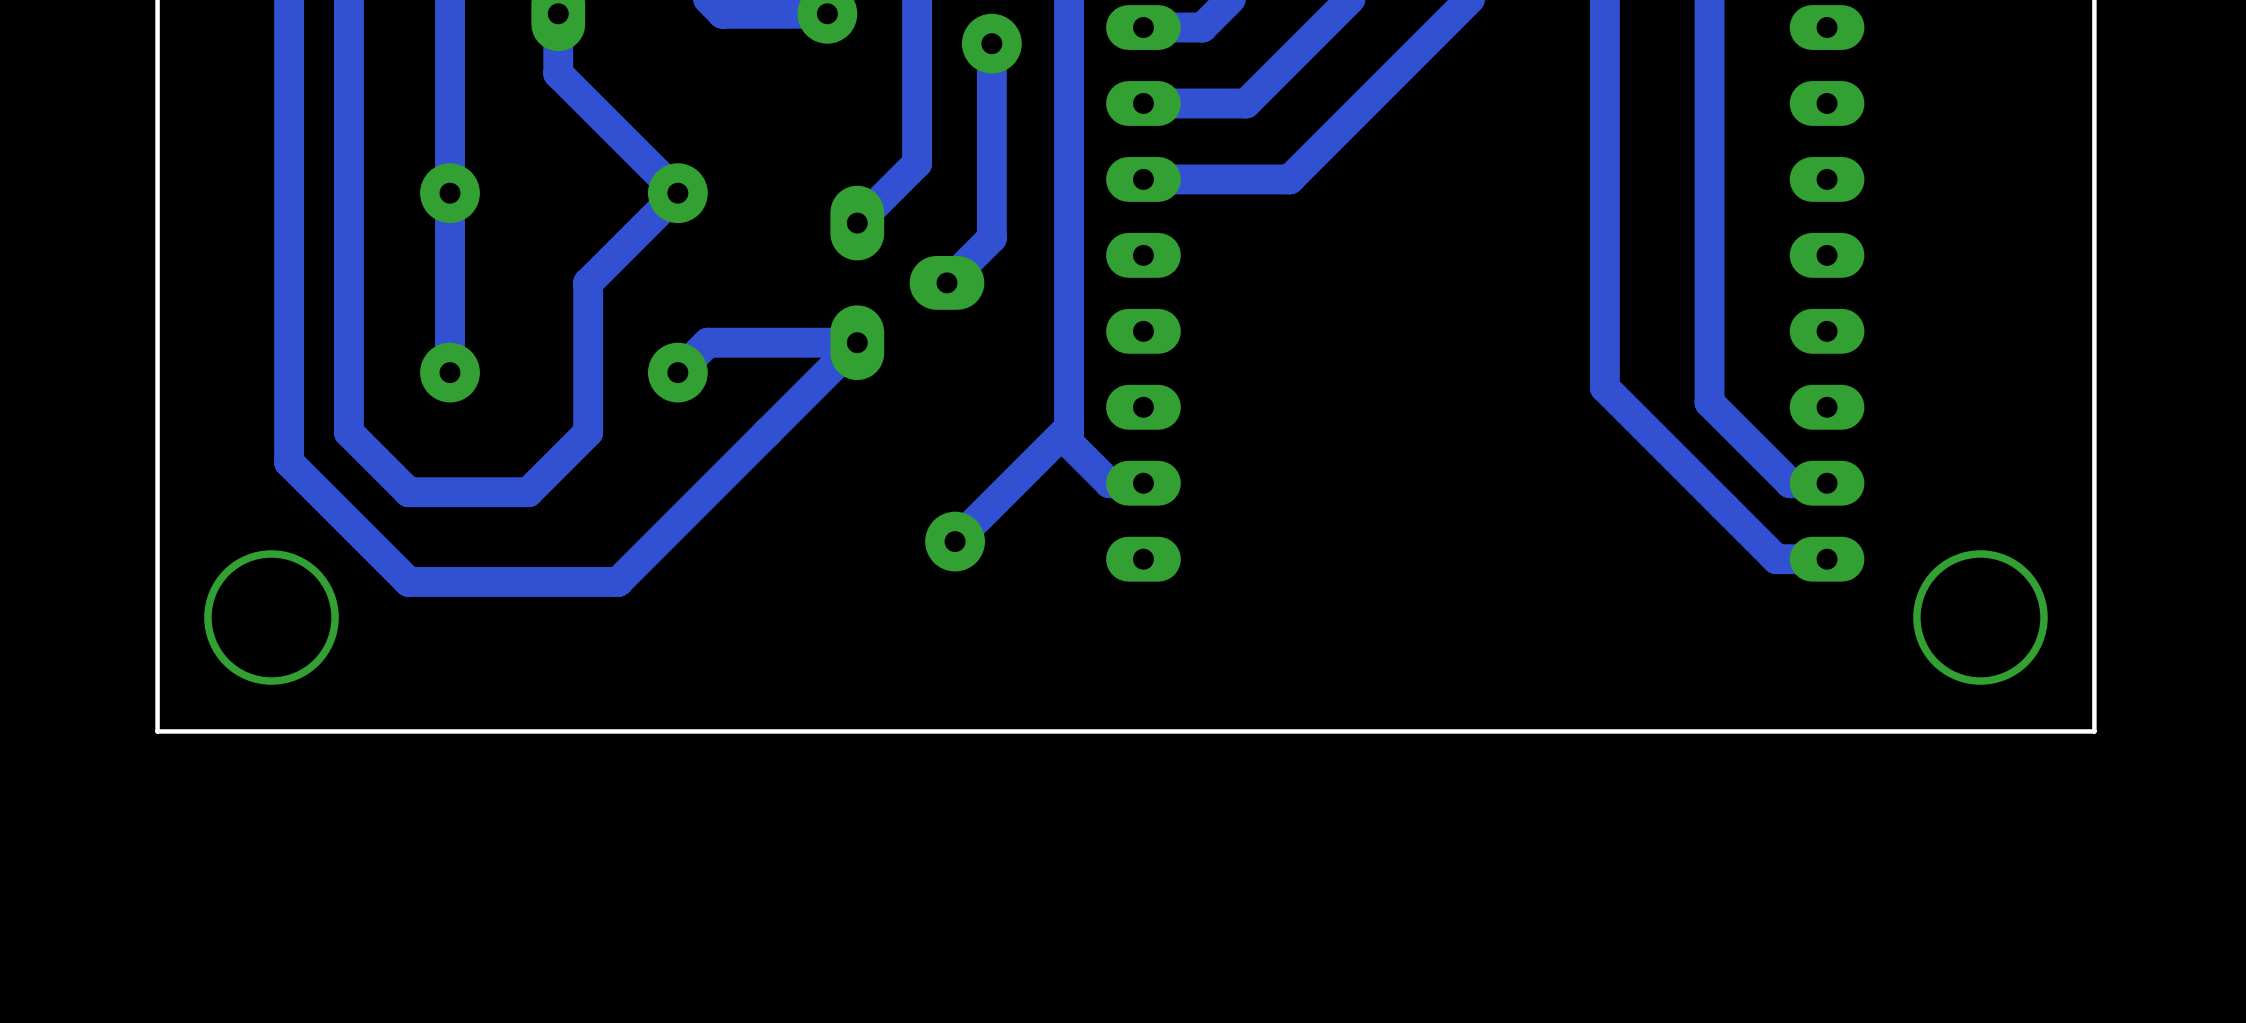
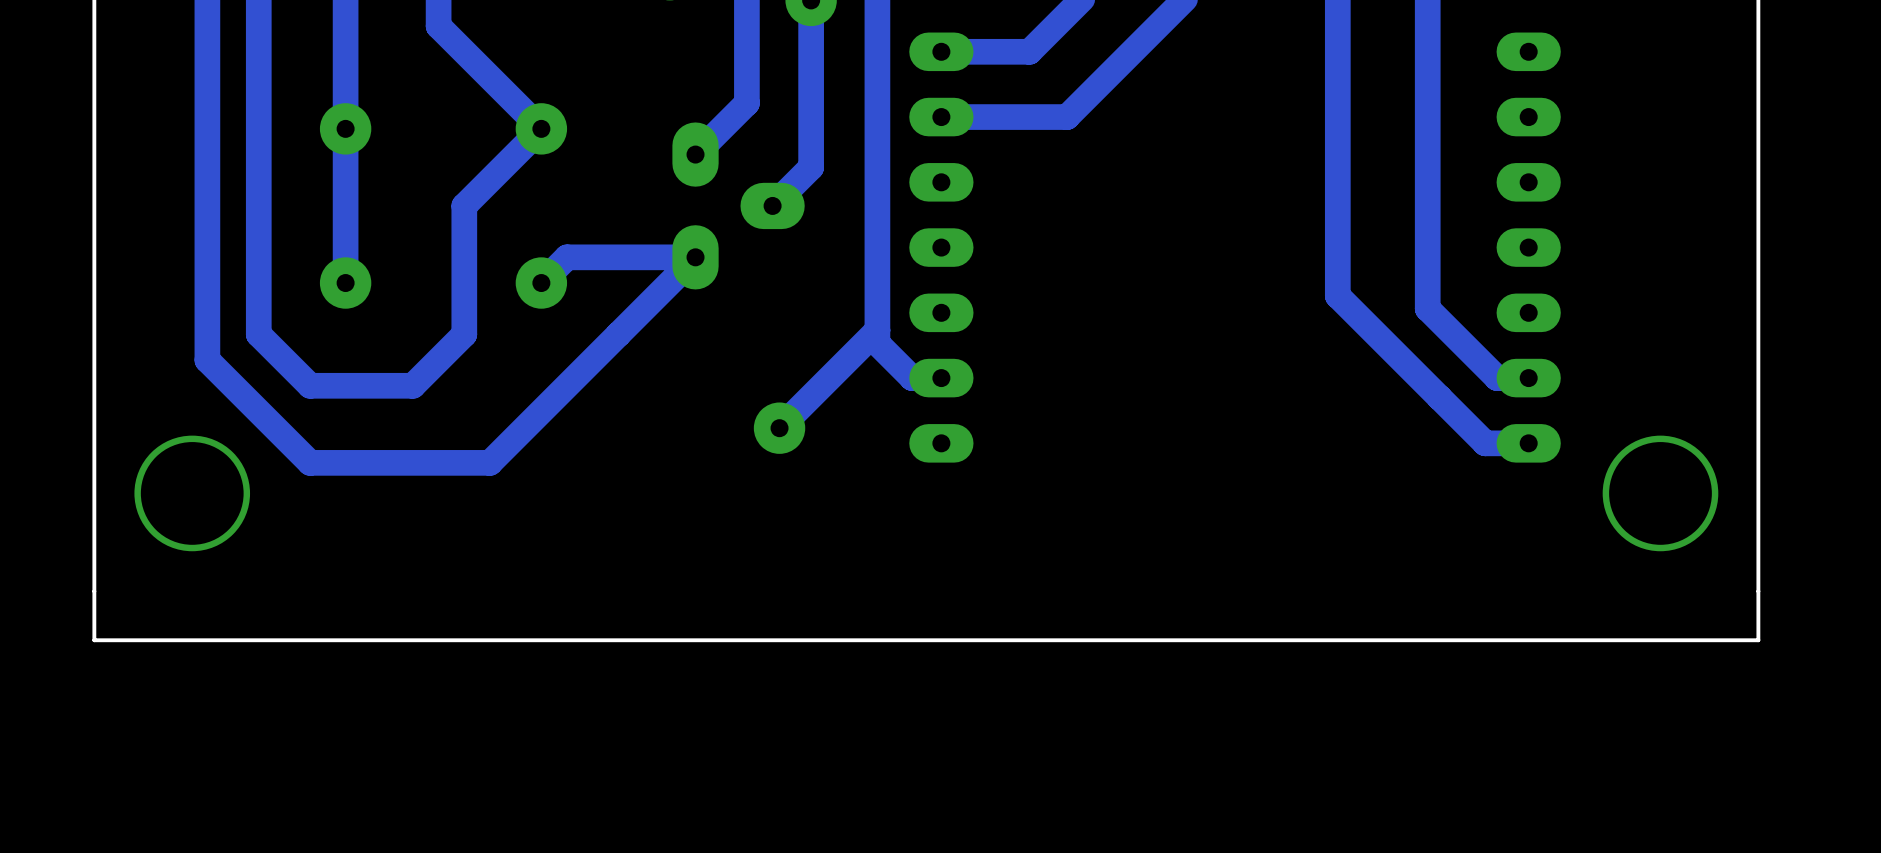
board edge: (2094, 731) (157, 731) -> (1758, 591) (1758, 640) (94, 640) (94, 591)

